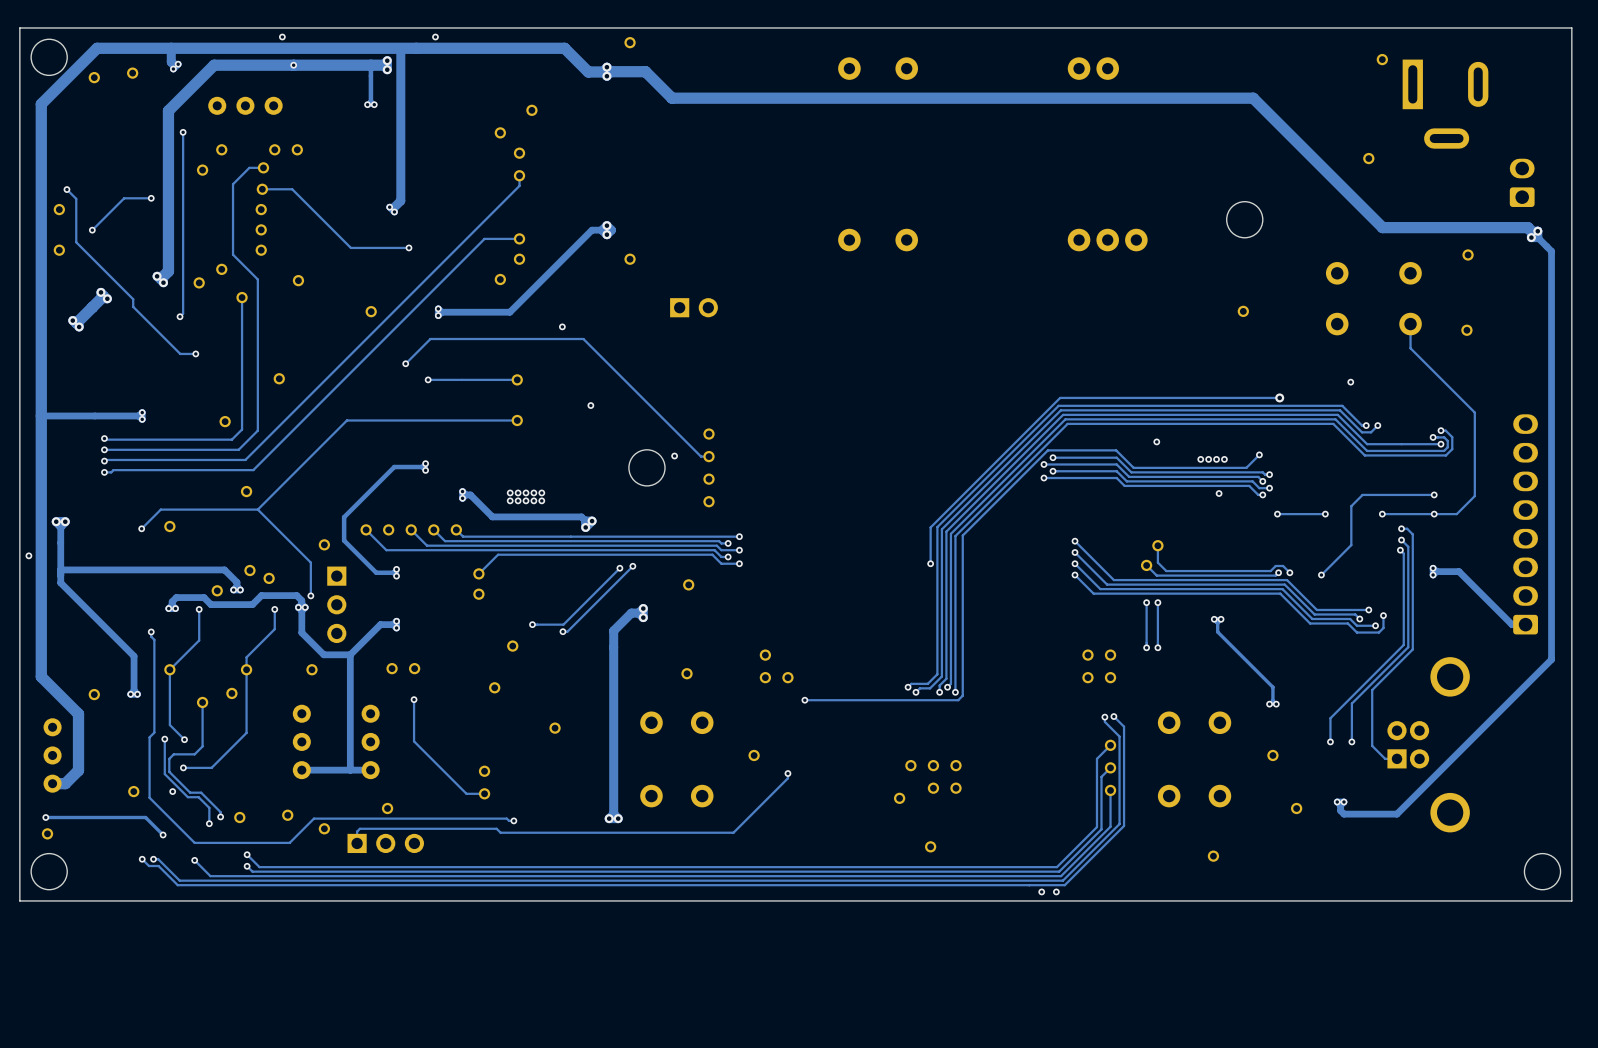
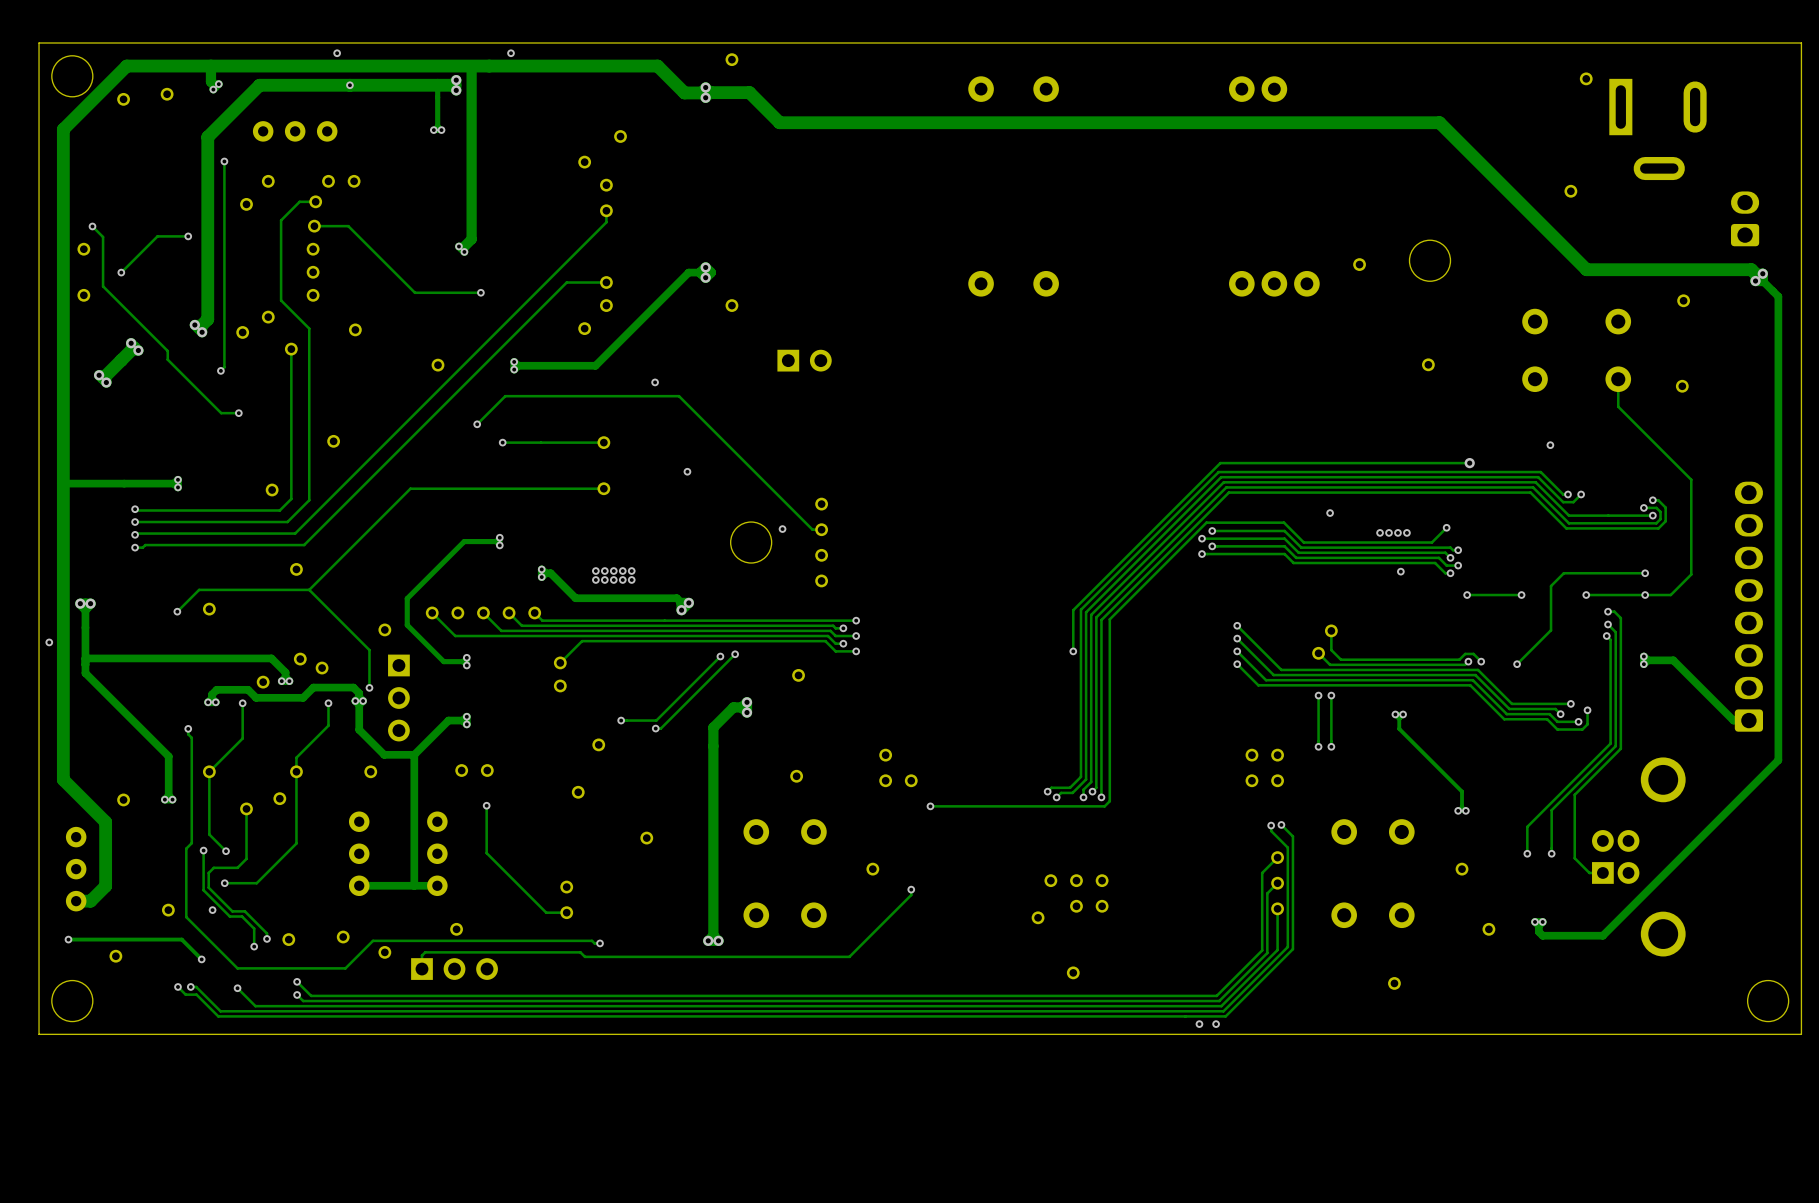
part: none -> (1359, 264)
part position: (47, 833) -> (115, 956)

